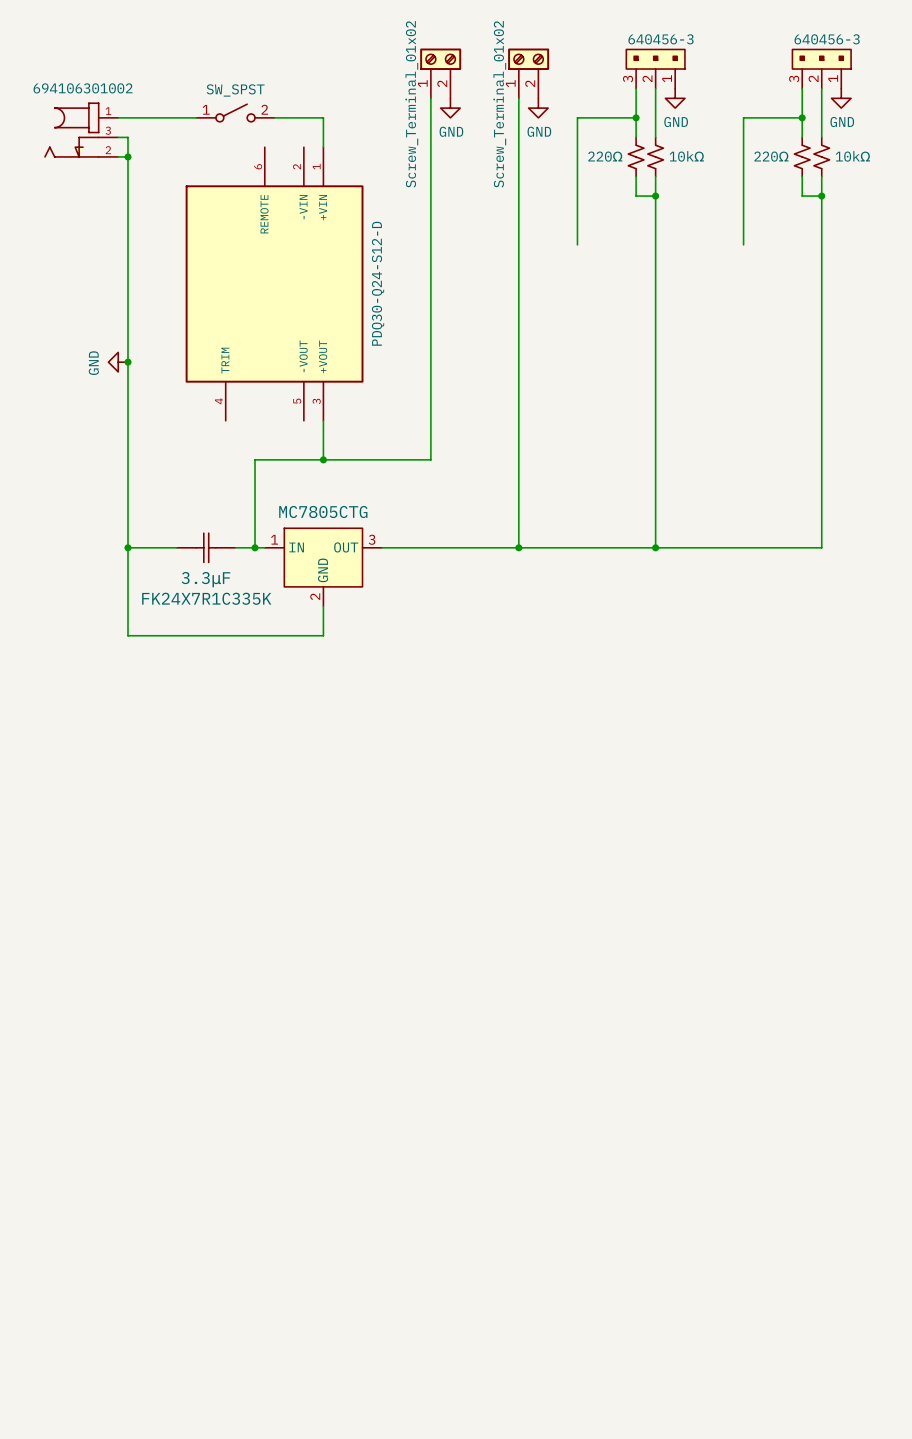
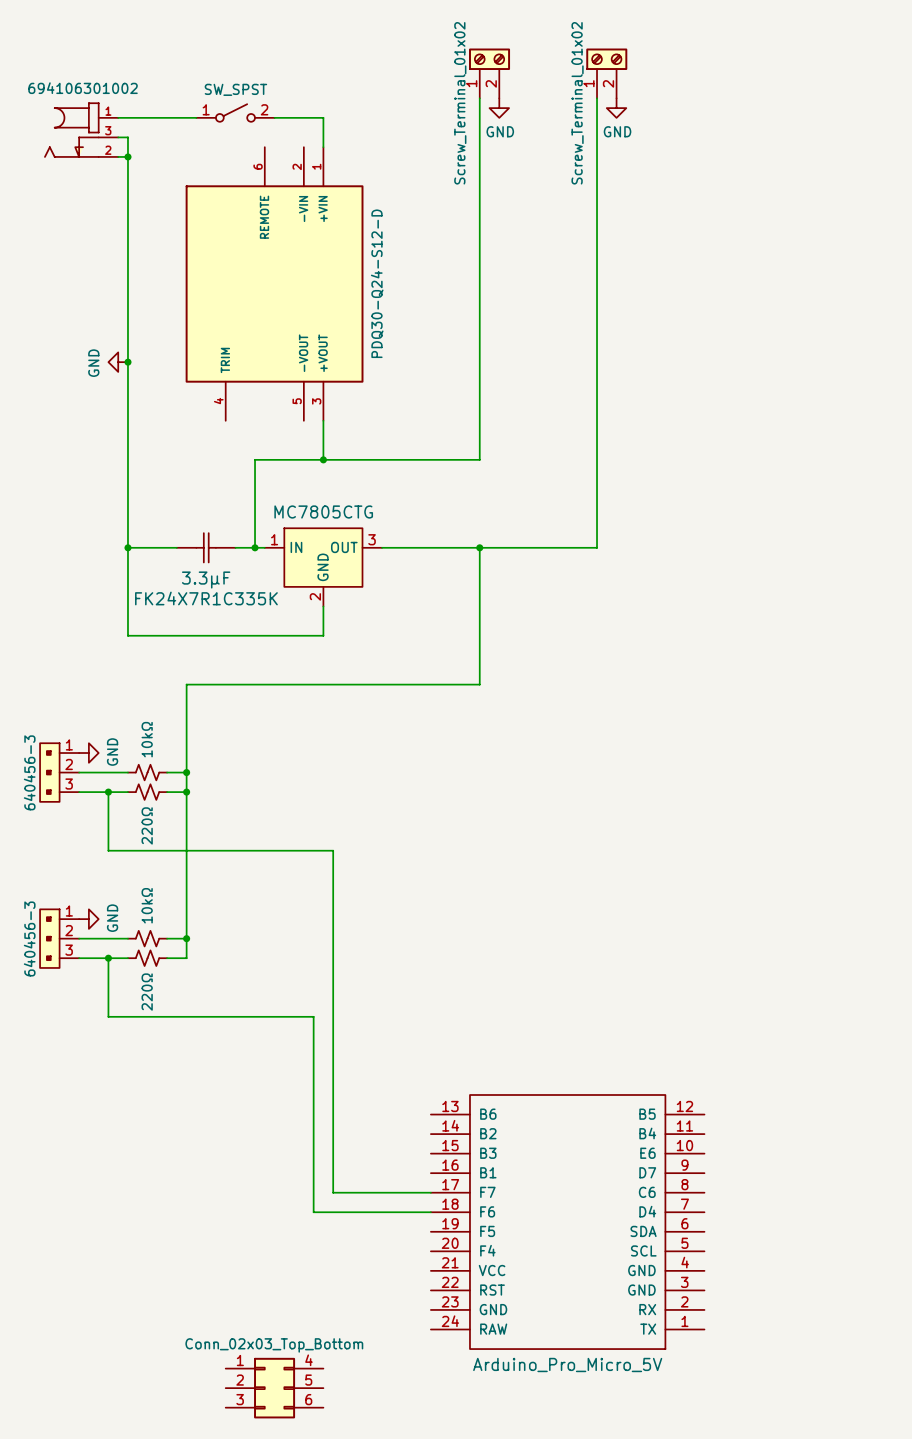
part: 640456-3 (655, 69) -> none
part: 640456-3 (821, 69) -> none
part: Screw_Terminal_01x02 (440, 73) -> none
part: none -> Screw_Terminal_01x02 (489, 73)
part: Screw_Terminal_01x02 (528, 73) -> none
part: none -> Screw_Terminal_01x02 (606, 73)
wire: (636, 88) (636, 137) -> none
wire: (655, 88) (655, 137) -> none
wire: (802, 88) (802, 137) -> none
wire: (821, 88) (821, 137) -> none
wire: (430, 98) (430, 459) -> (479, 98) (479, 459) (430, 459)
wire: (518, 98) (518, 547) -> none
power symbol: GND (675, 98) -> none
power symbol: GND (841, 98) -> none
power symbol: GND (450, 108) -> none
power symbol: none -> GND (499, 108)
power symbol: GND (538, 108) -> none
power symbol: none -> GND (616, 108)
wire: (636, 117) (577, 117) (577, 244) -> none
junction: (636, 117) -> none
wire: (802, 117) (743, 117) (743, 244) -> none
junction: (802, 117) -> none
part: 220Ω (636, 156) -> none
part: 10kΩ (655, 156) -> none
part: 220Ω (802, 156) -> none
part: 10kΩ (821, 156) -> none
wire: (636, 176) (636, 196) (655, 196) -> none
wire: (655, 176) (655, 547) -> none
wire: (802, 176) (802, 196) (821, 196) -> none
wire: (821, 176) (821, 547) (597, 547) -> (597, 98) (597, 547)
junction: (655, 196) -> none
junction: (821, 196) -> none
wire: none -> (479, 547) (479, 684) (186, 684) (186, 958) (167, 958)
junction position: (518, 547) -> (479, 547)
junction: (655, 547) -> none
power symbol: none -> GND (88, 753)
part: none -> 640456-3 (59, 772)
wire: none -> (79, 772) (127, 772)
part: none -> 10kΩ (147, 772)
wire: none -> (167, 772) (186, 772)
junction: none -> (186, 772)
wire: none -> (79, 792) (127, 792)
wire: none -> (108, 792) (108, 850) (333, 850) (333, 1192) (430, 1192)
junction: none -> (108, 792)
part: none -> 220Ω (147, 792)
wire: none -> (167, 792) (186, 792)
junction: none -> (186, 792)
power symbol: none -> GND (88, 919)
part: none -> 640456-3 (59, 938)
wire: none -> (79, 938) (127, 938)
part: none -> 10kΩ (147, 938)
wire: none -> (167, 938) (186, 938)
junction: none -> (186, 938)
wire: none -> (79, 958) (127, 958)
wire: none -> (108, 958) (108, 1016) (313, 1016) (313, 1212) (430, 1212)
junction: none -> (108, 958)
part: none -> 220Ω (147, 958)
part: none -> Arduino_Pro_Micro_5V (567, 1222)
part: none -> Conn_02x03_Top_Bottom (274, 1388)

